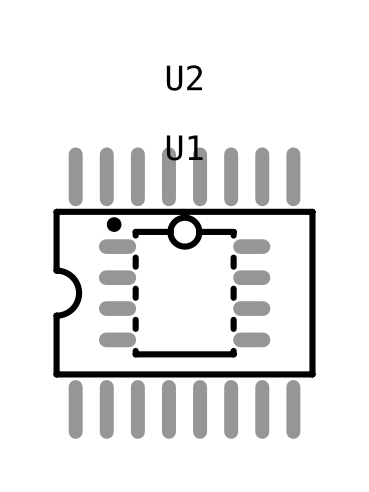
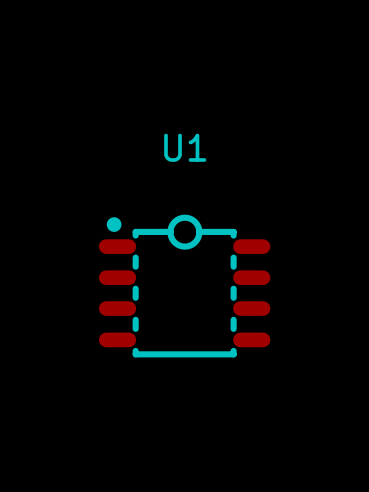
U2: (184, 293) -> none

